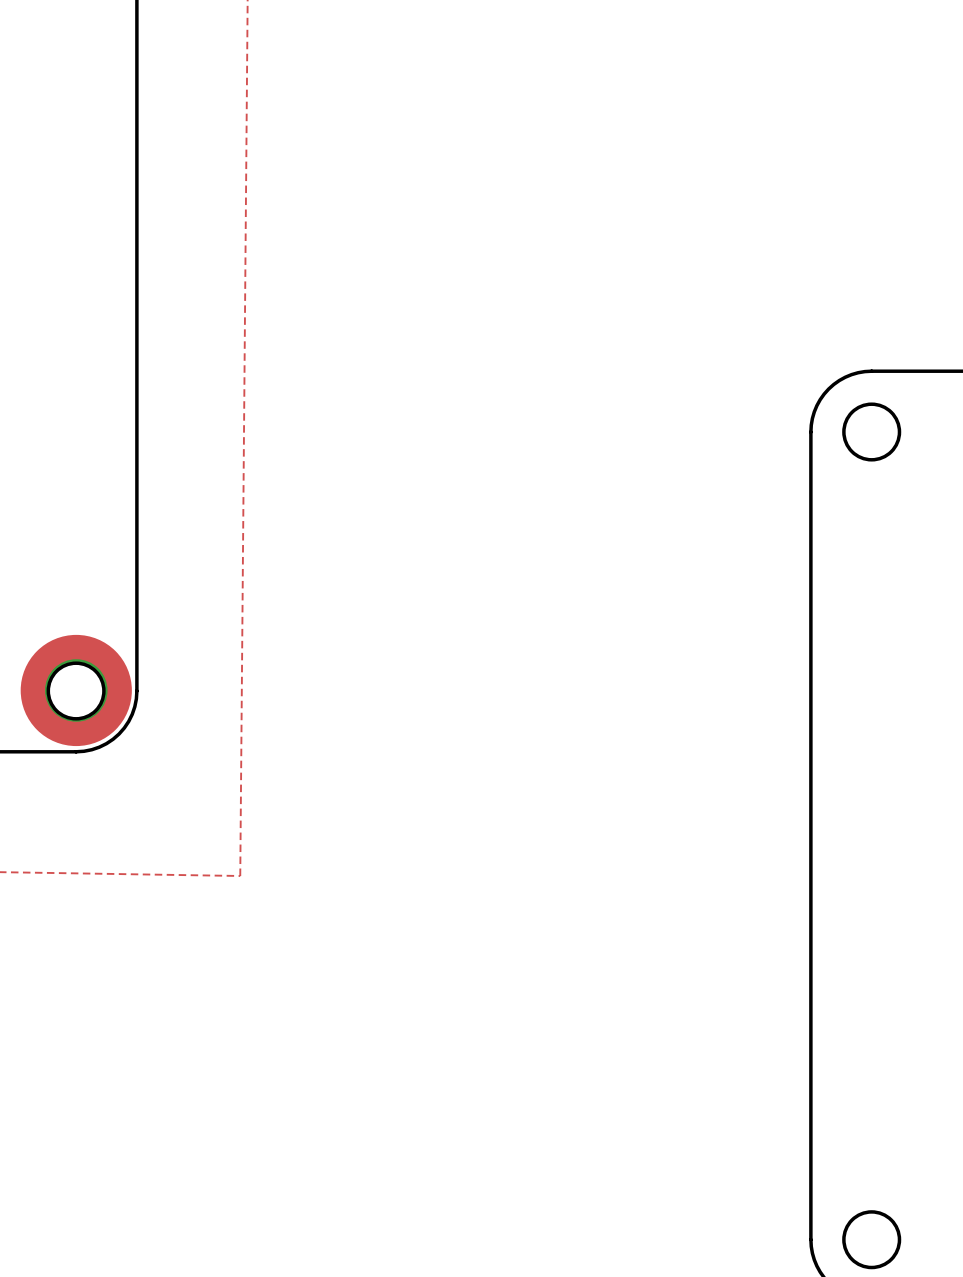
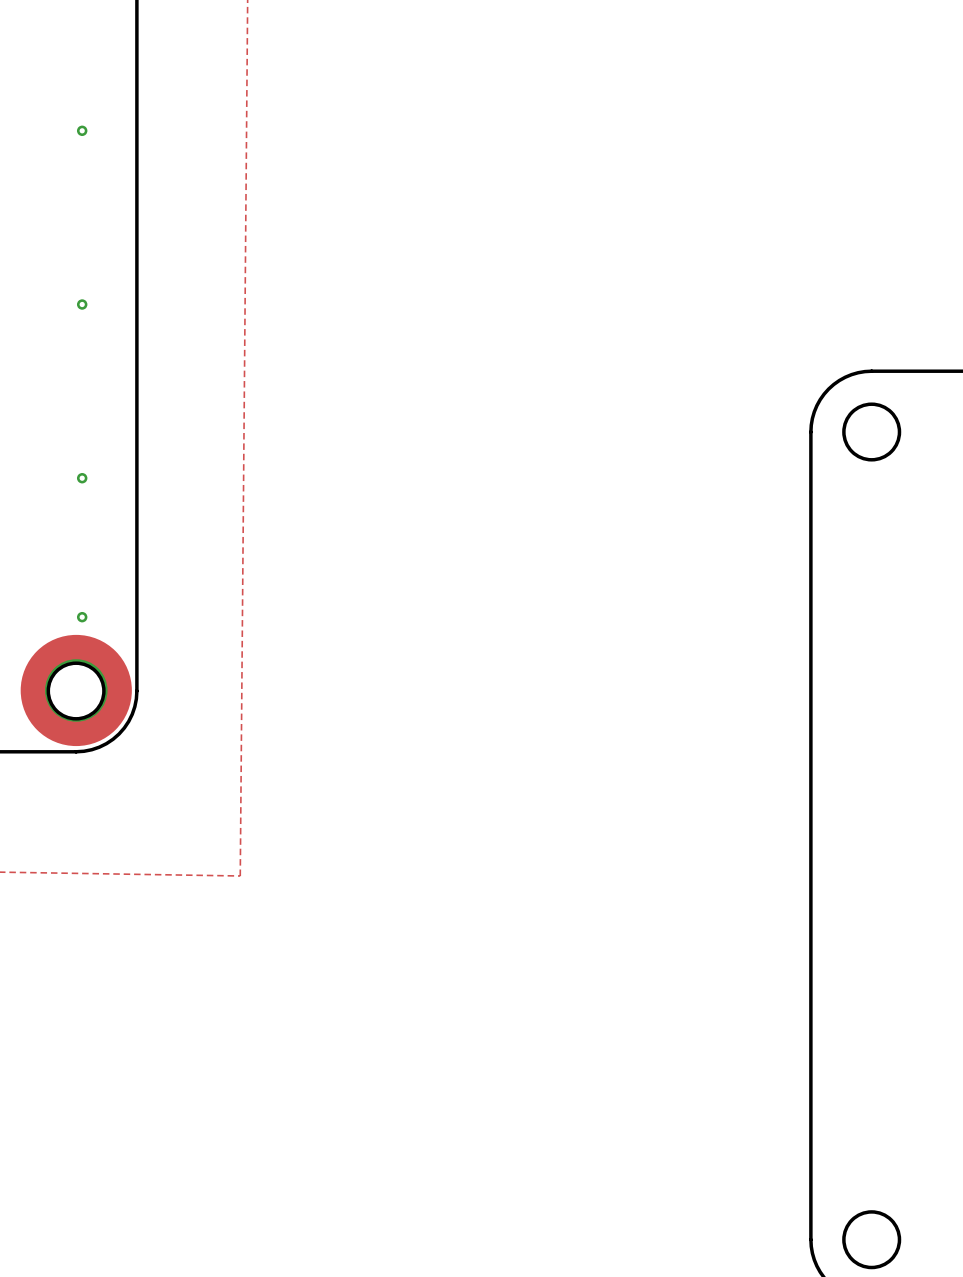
via: none -> (82, 130)
via: none -> (82, 304)
via: none -> (82, 478)
via: none -> (82, 617)

